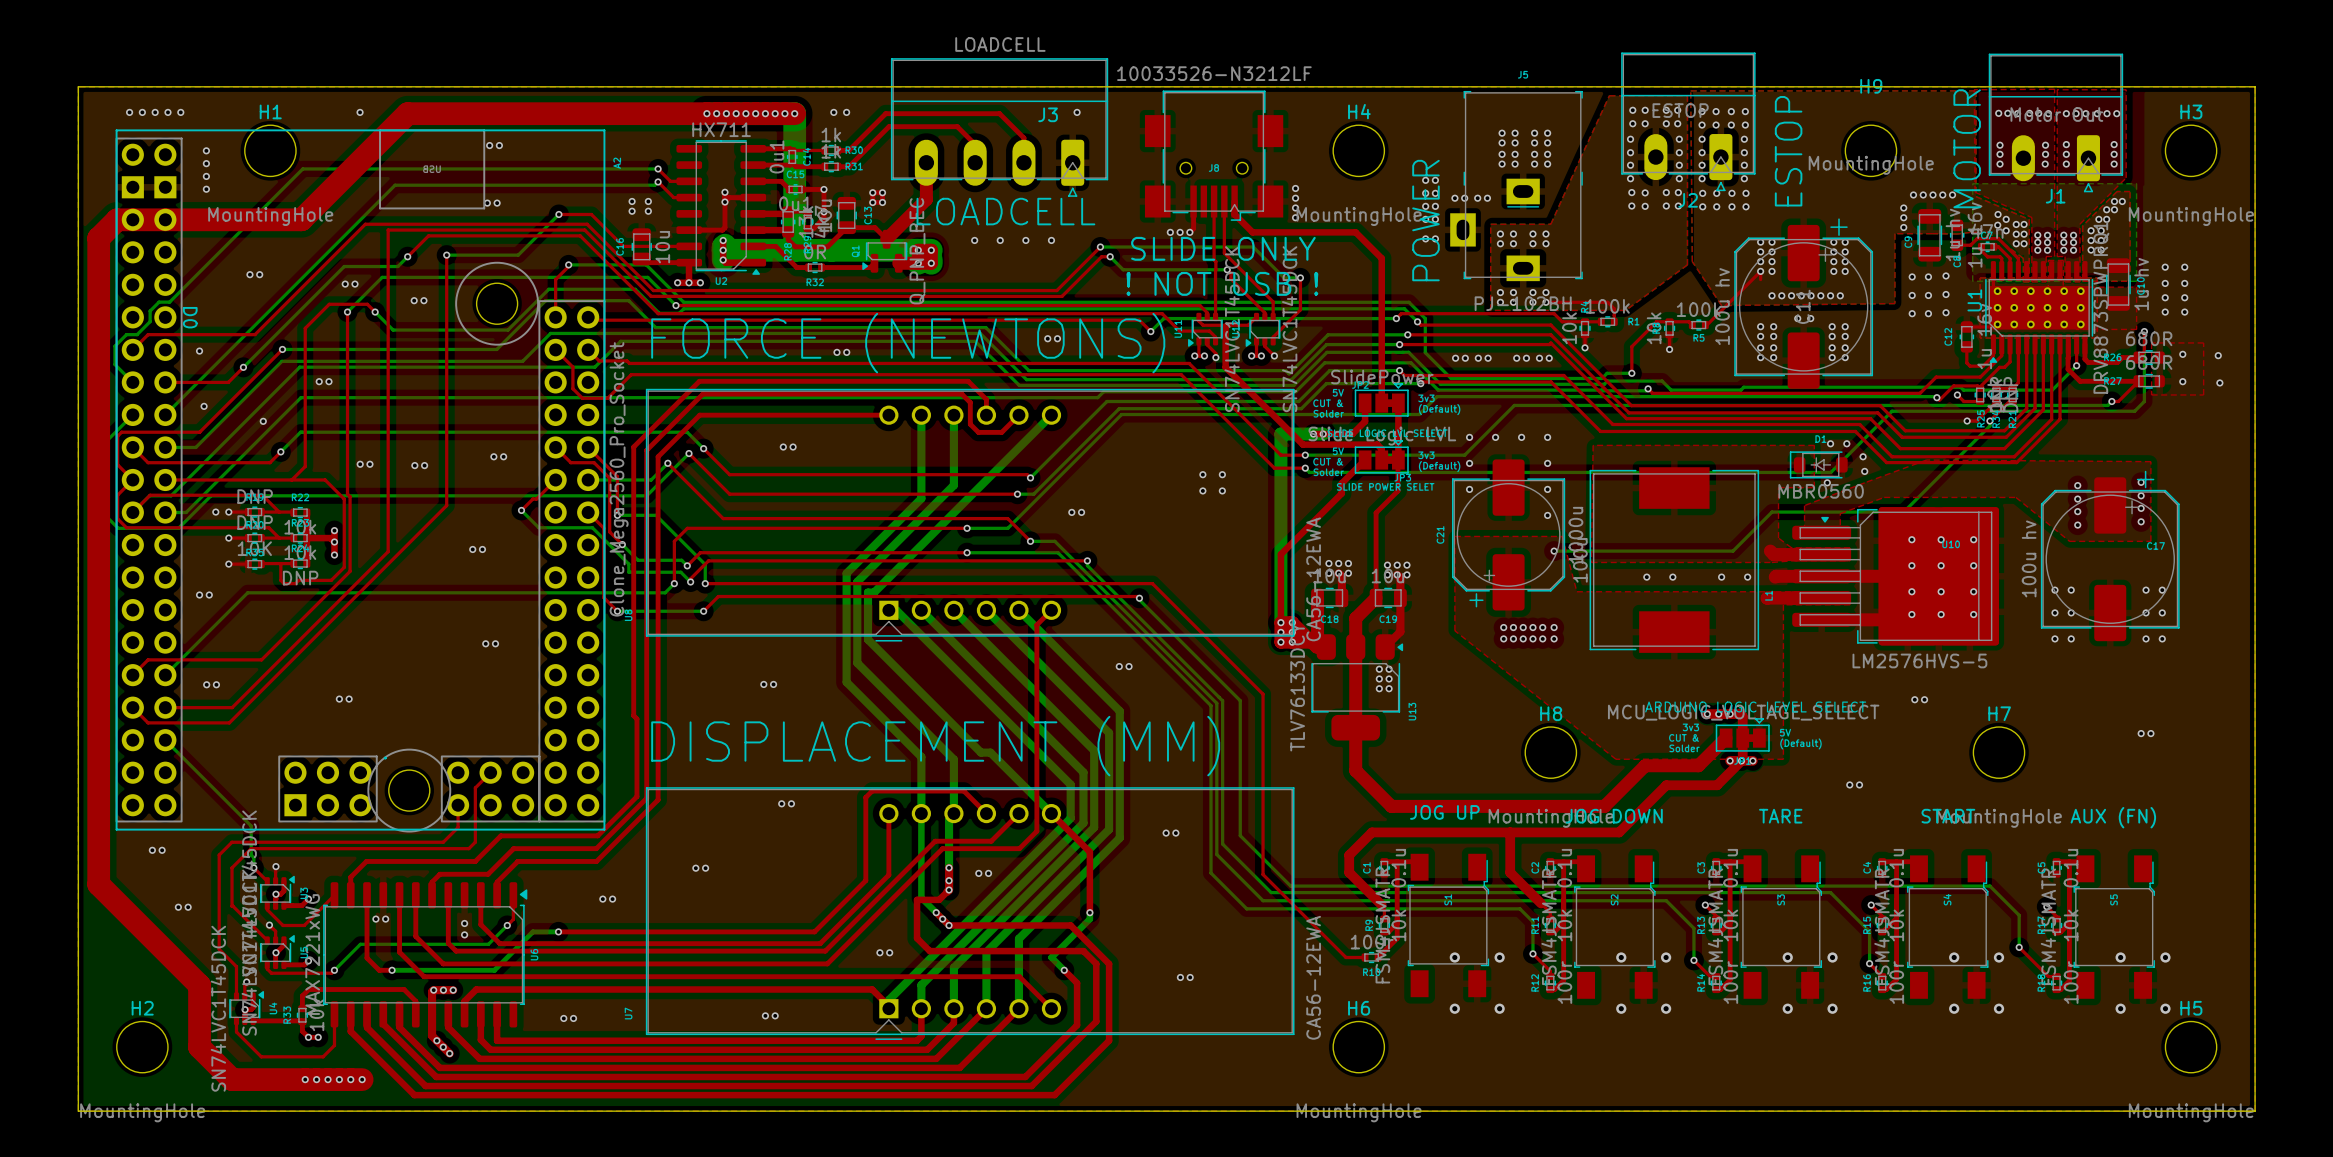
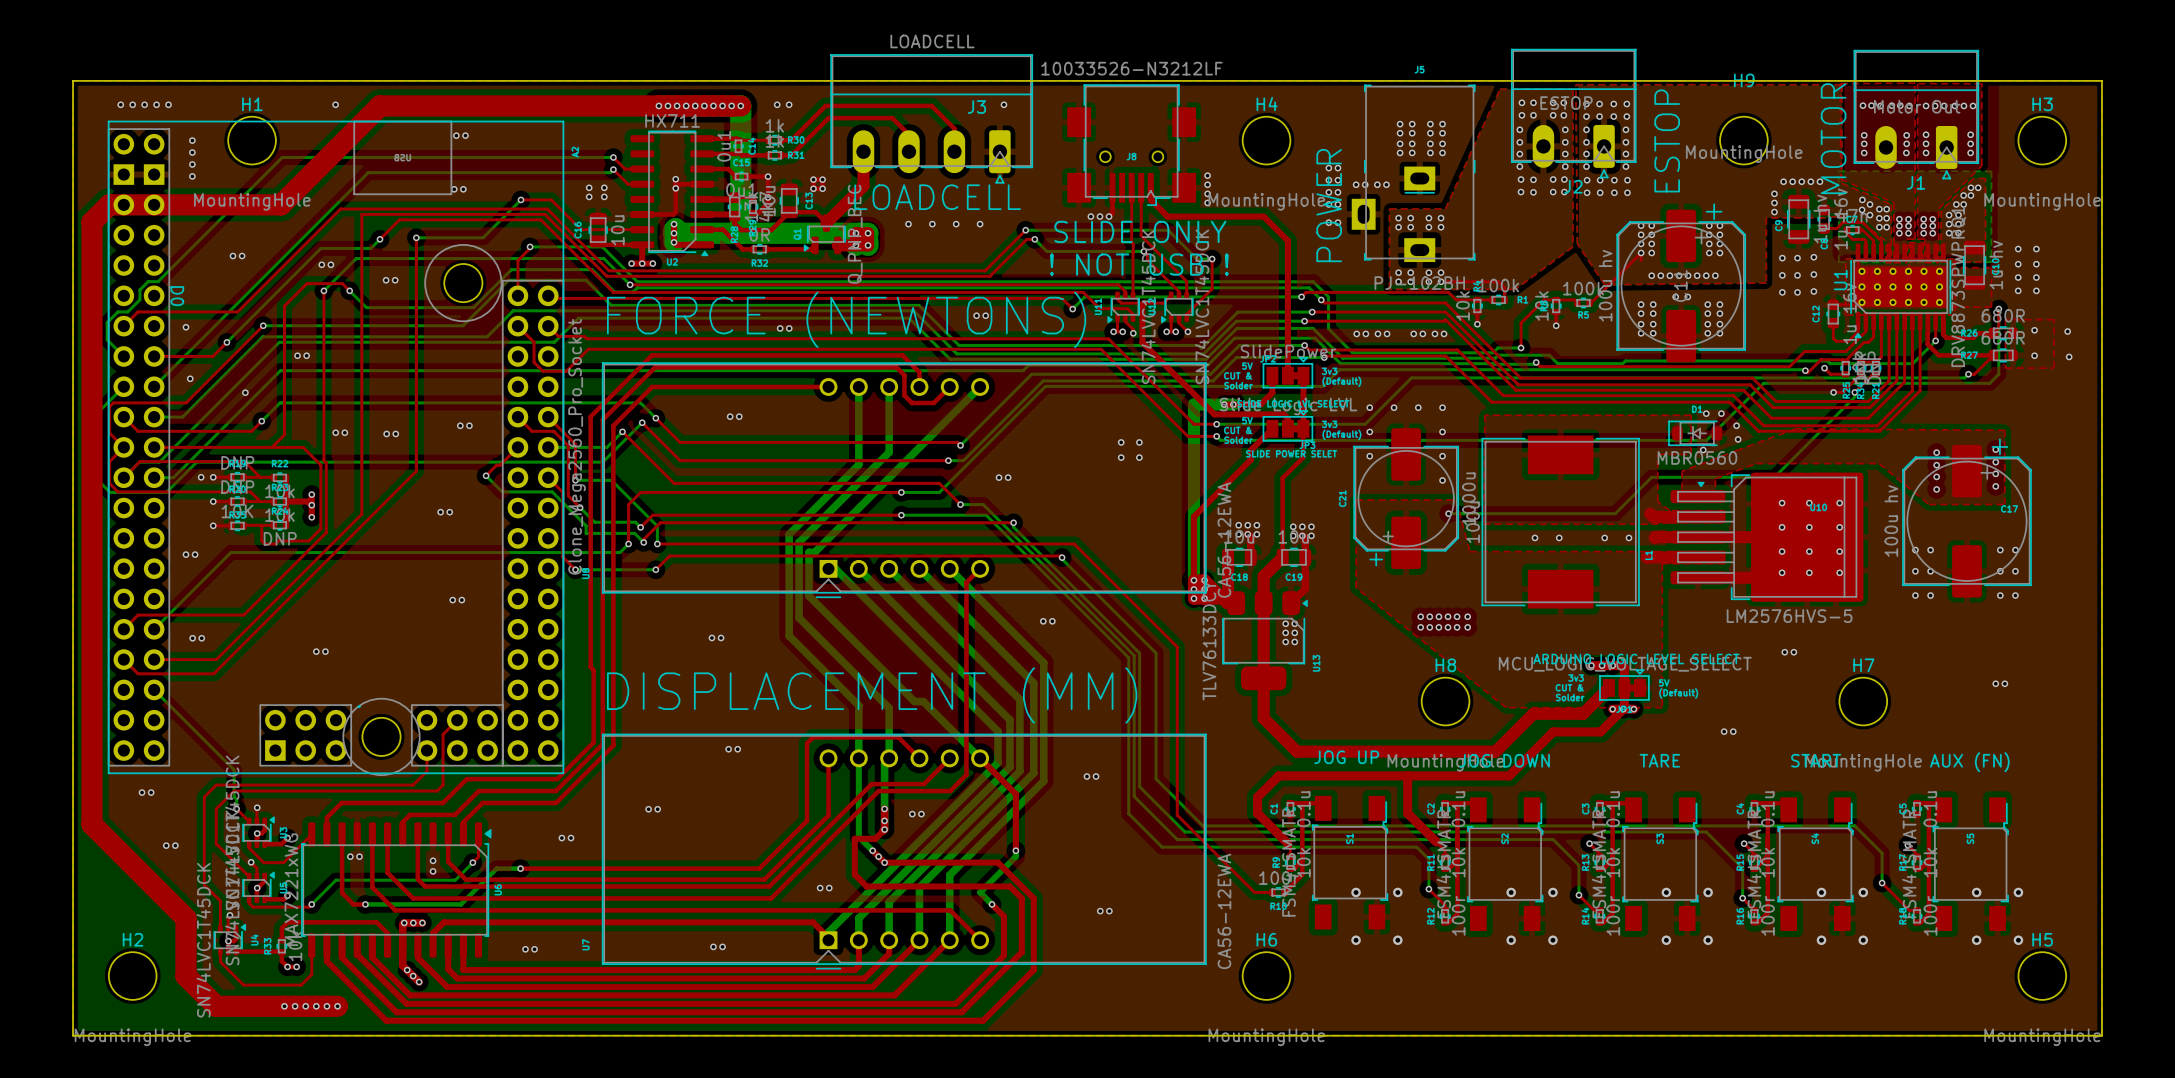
via: (1503, 627) -> none
via: (1513, 627) -> none
via: (1523, 627) -> none
via: (1532, 627) -> none
via: (1542, 627) -> none
via: (1554, 627) -> none
via: (1503, 638) -> none
via: (1513, 638) -> none
via: (1523, 638) -> none
via: (1532, 638) -> none
via: (1542, 638) -> none
via: (1554, 638) -> none
via: none -> (1420, 616)
via: none -> (1429, 616)
via: none -> (1438, 616)
via: none -> (1447, 616)
via: none -> (1457, 616)
via: none -> (1467, 616)
via: none -> (1420, 627)
via: none -> (1429, 627)
via: none -> (1438, 627)
via: none -> (1447, 627)
via: none -> (1457, 627)
via: none -> (1467, 627)

